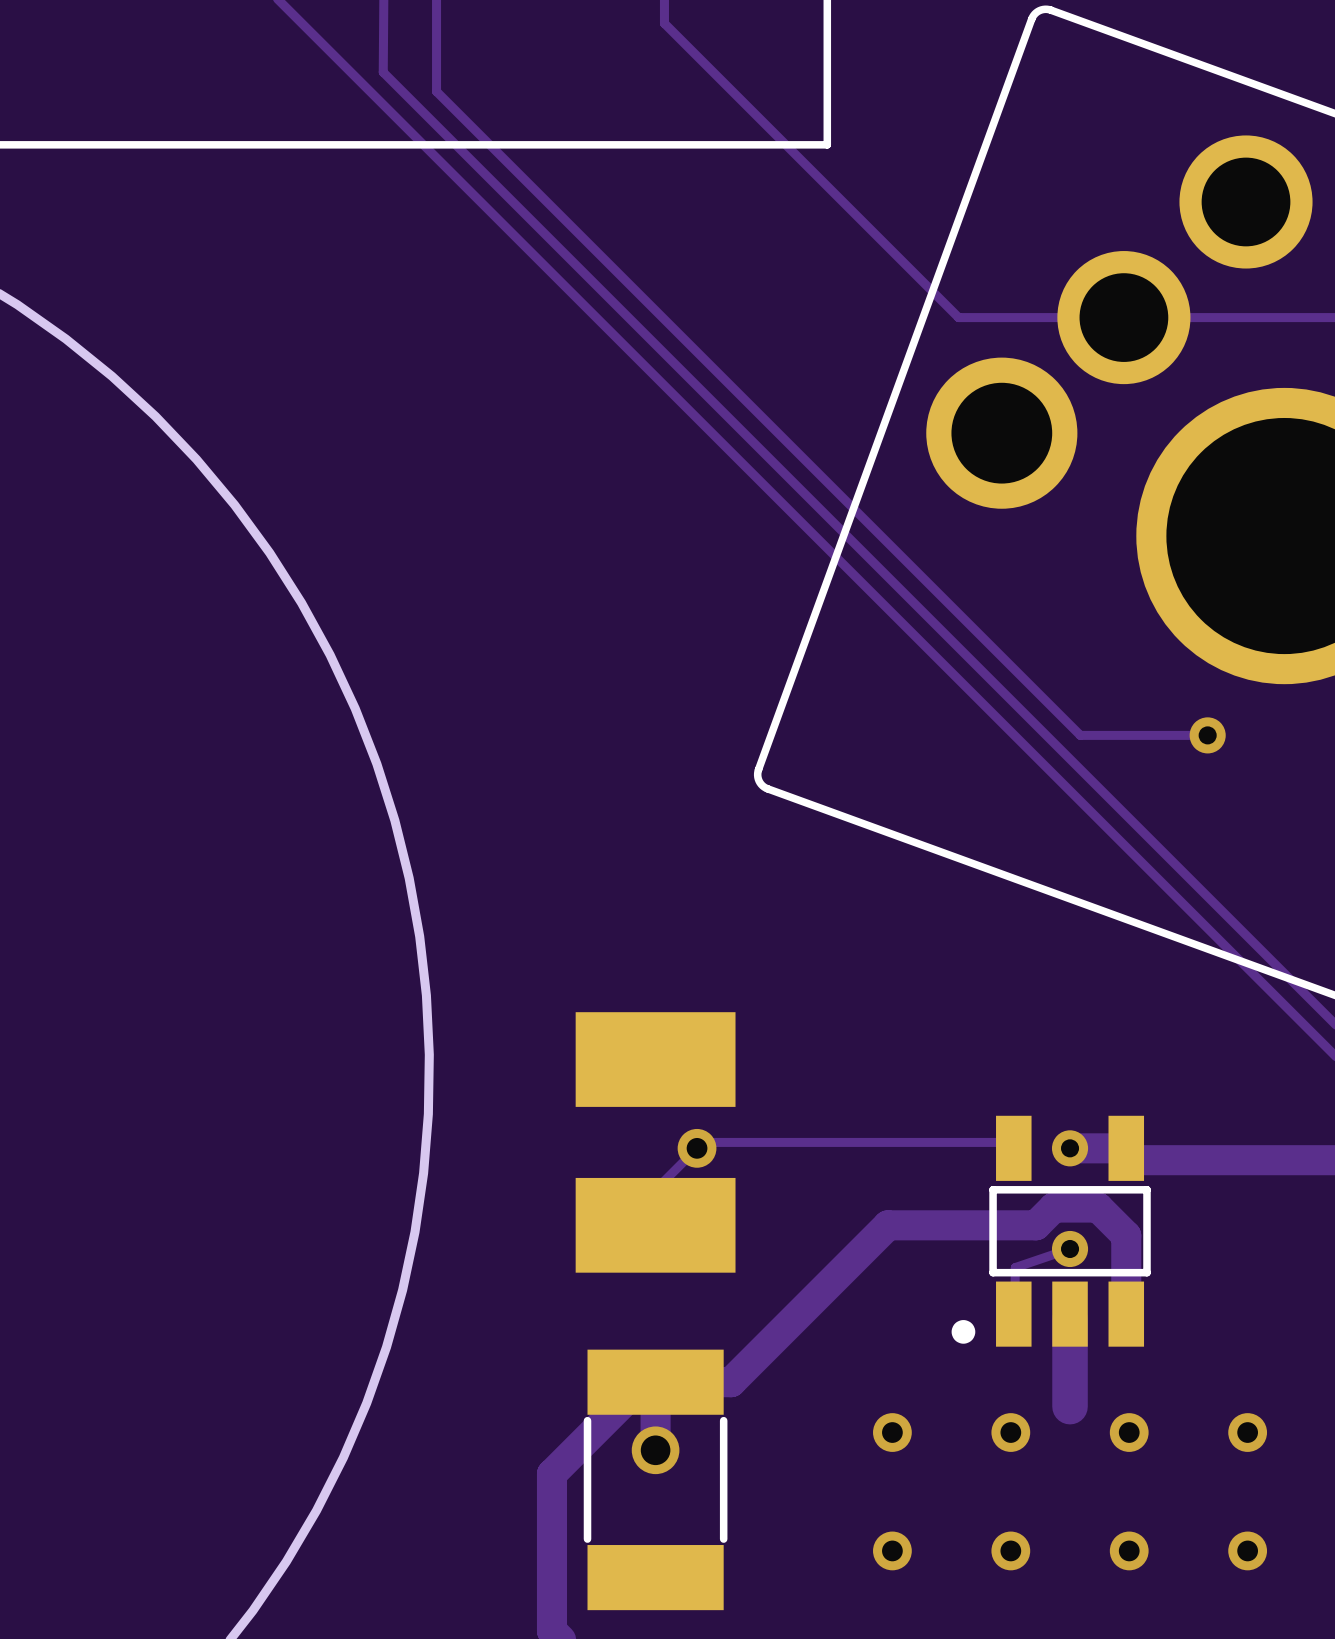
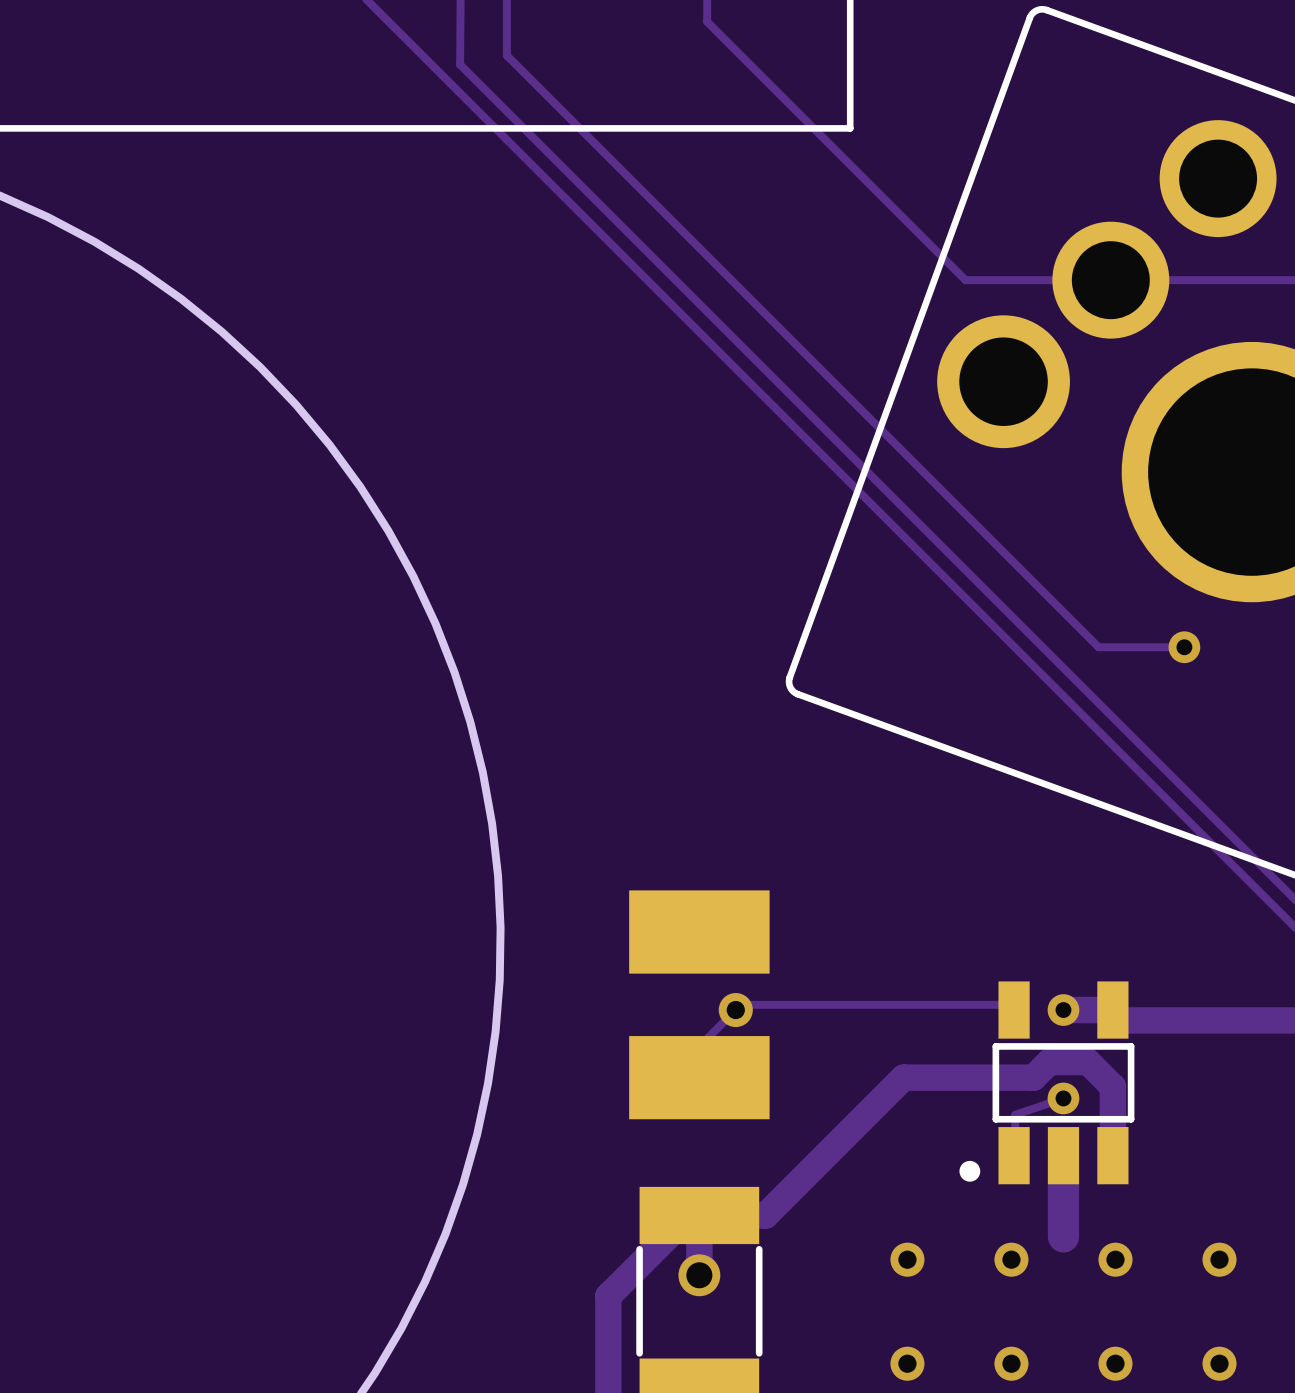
track: (436, 61) (436, 91) (1080, 735) (1109, 735) -> (506, 55) (1098, 647)

